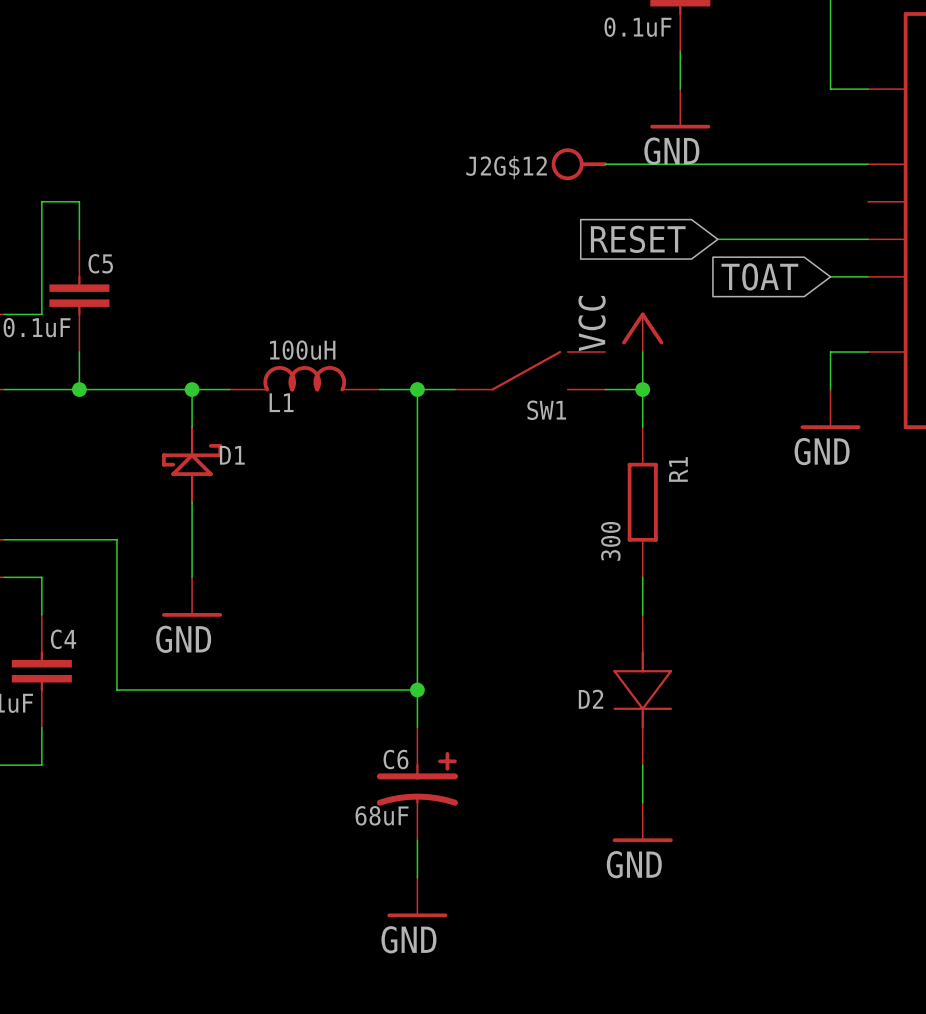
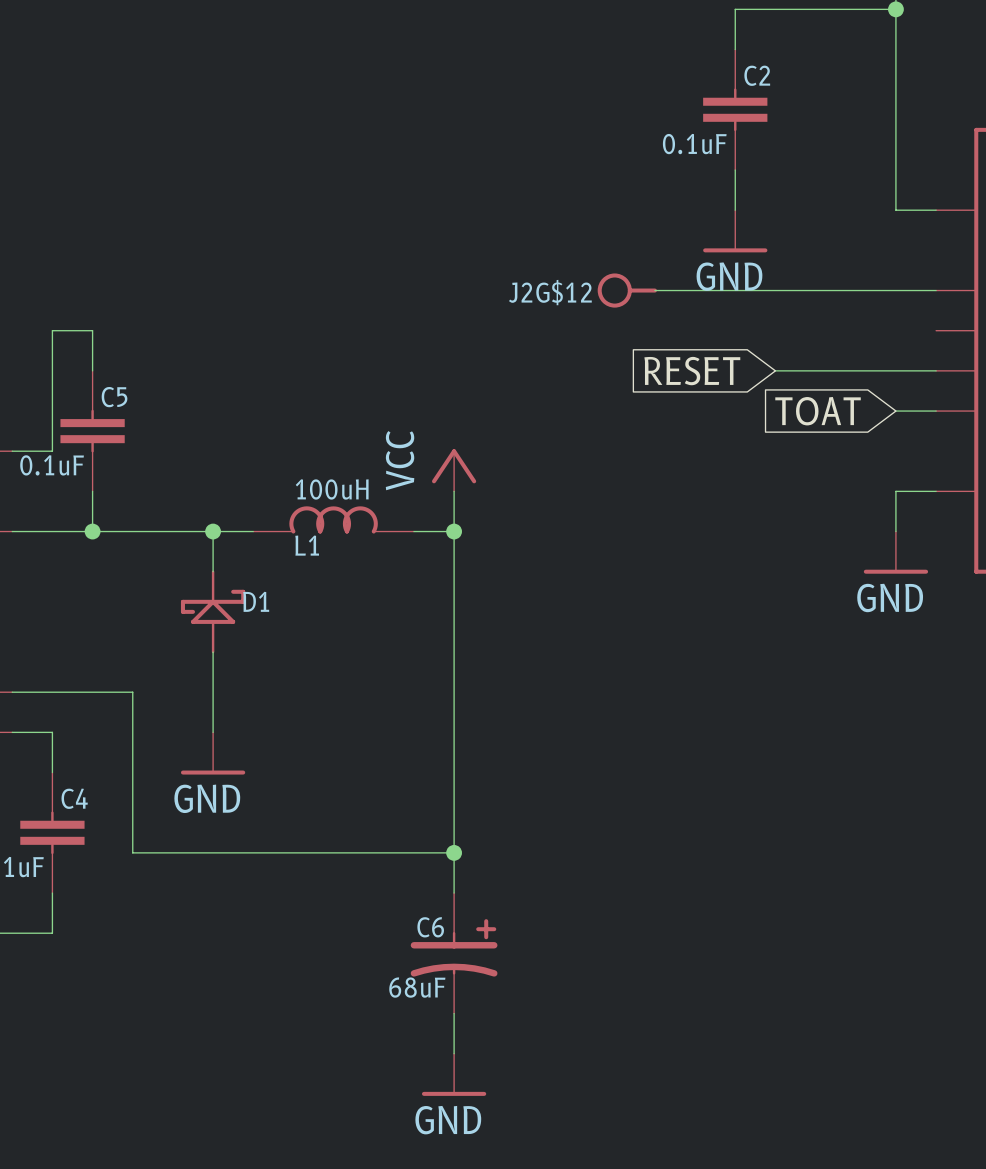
power symbol position: VCC (642, 332) -> VCC (454, 470)
wire: (642, 352) (642, 427) -> none
SW1: (530, 370) -> none
wire: (417, 389) (454, 389) -> (454, 531) (454, 491)
wire: (605, 389) (642, 389) -> none
junction: (642, 389) -> none
R1: 300 (642, 502) -> none
wire: (642, 577) (642, 614) -> none
D2: (642, 690) -> none
wire: (642, 765) (642, 802) -> none
power symbol: GND (642, 822) -> none

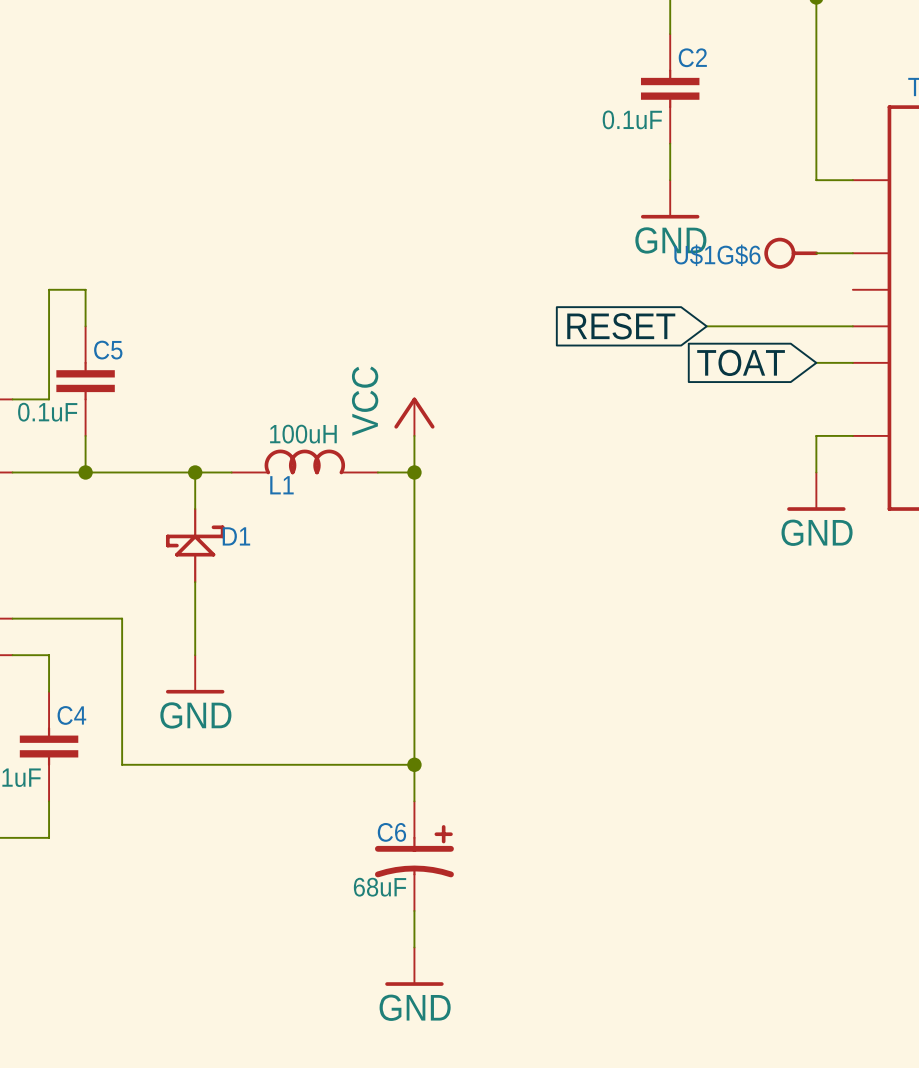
J2G$12: (627, 290) -> none
wire: (654, 290) (895, 290) -> none
U$1G$6: none -> (791, 253)

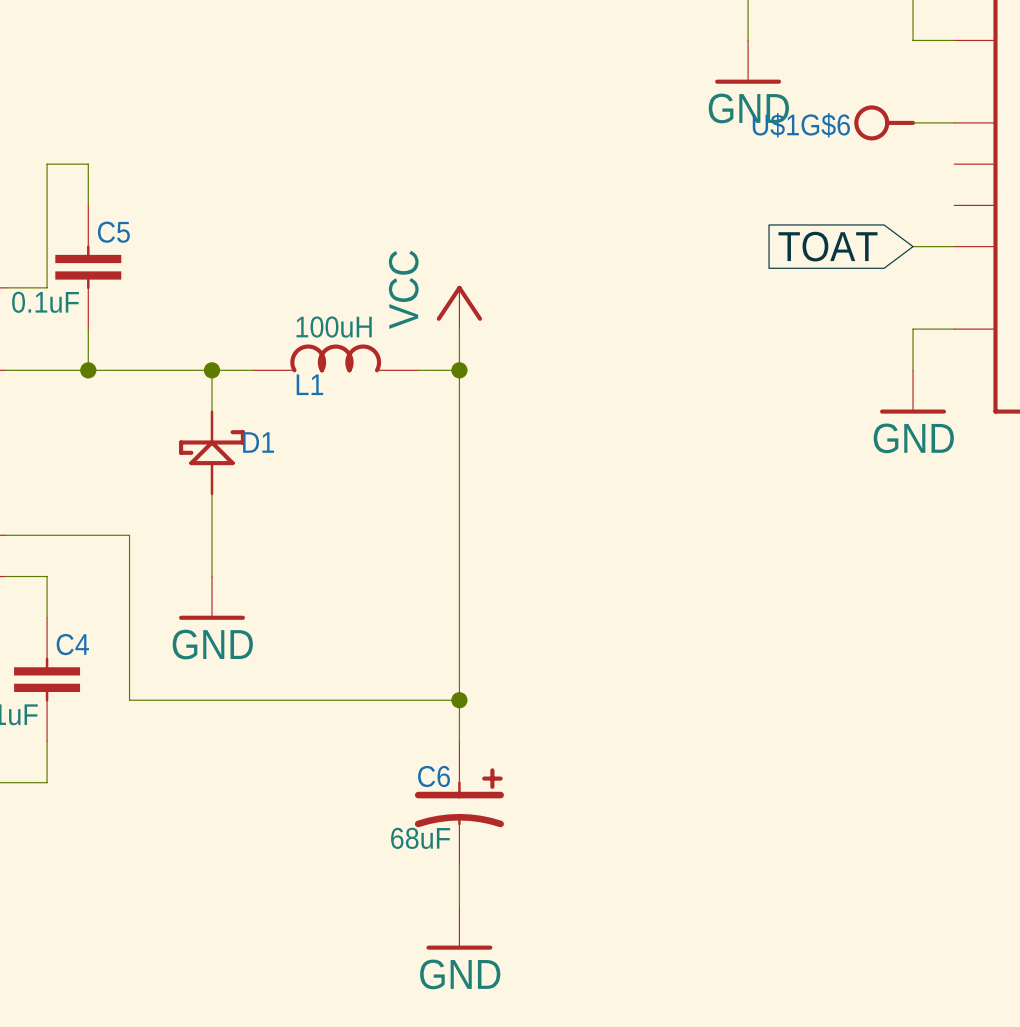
global label: RESET (621, 326) -> none
wire: (706, 326) (852, 326) -> none

